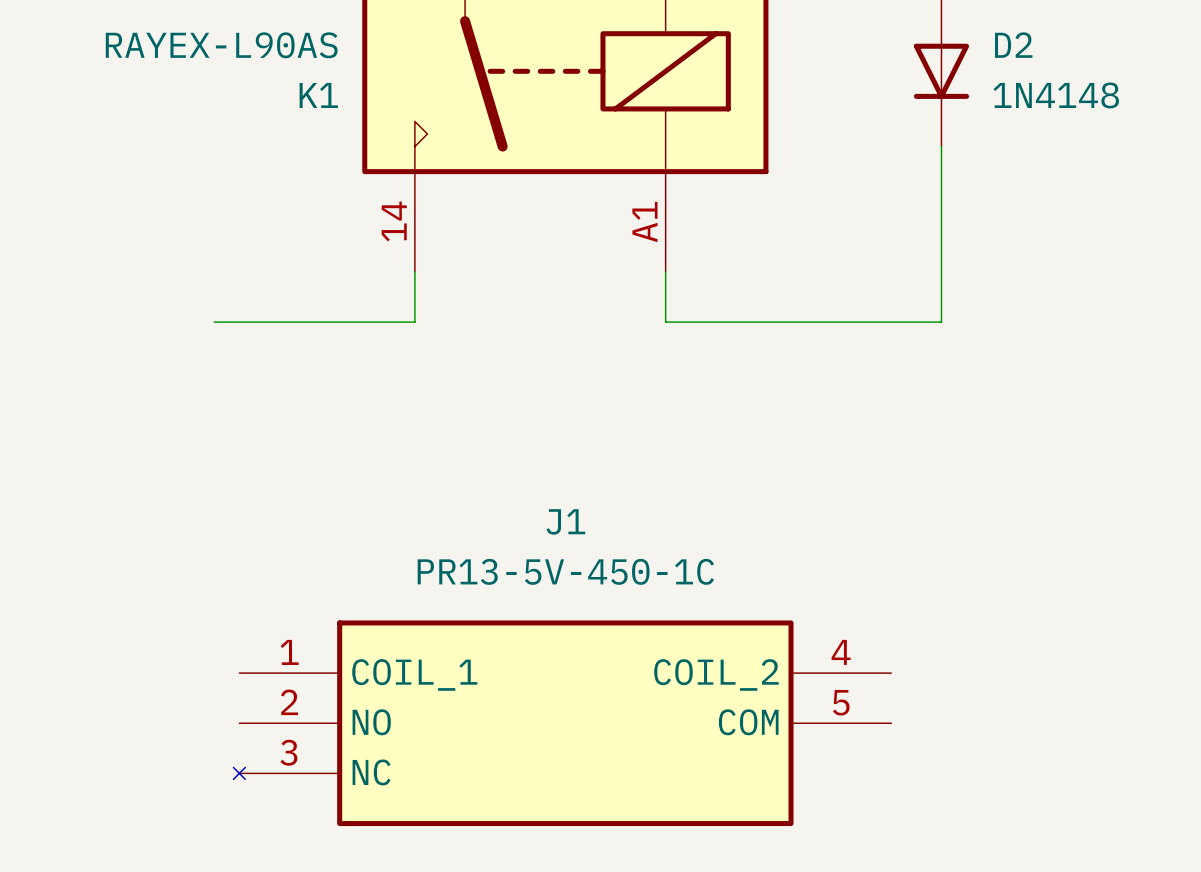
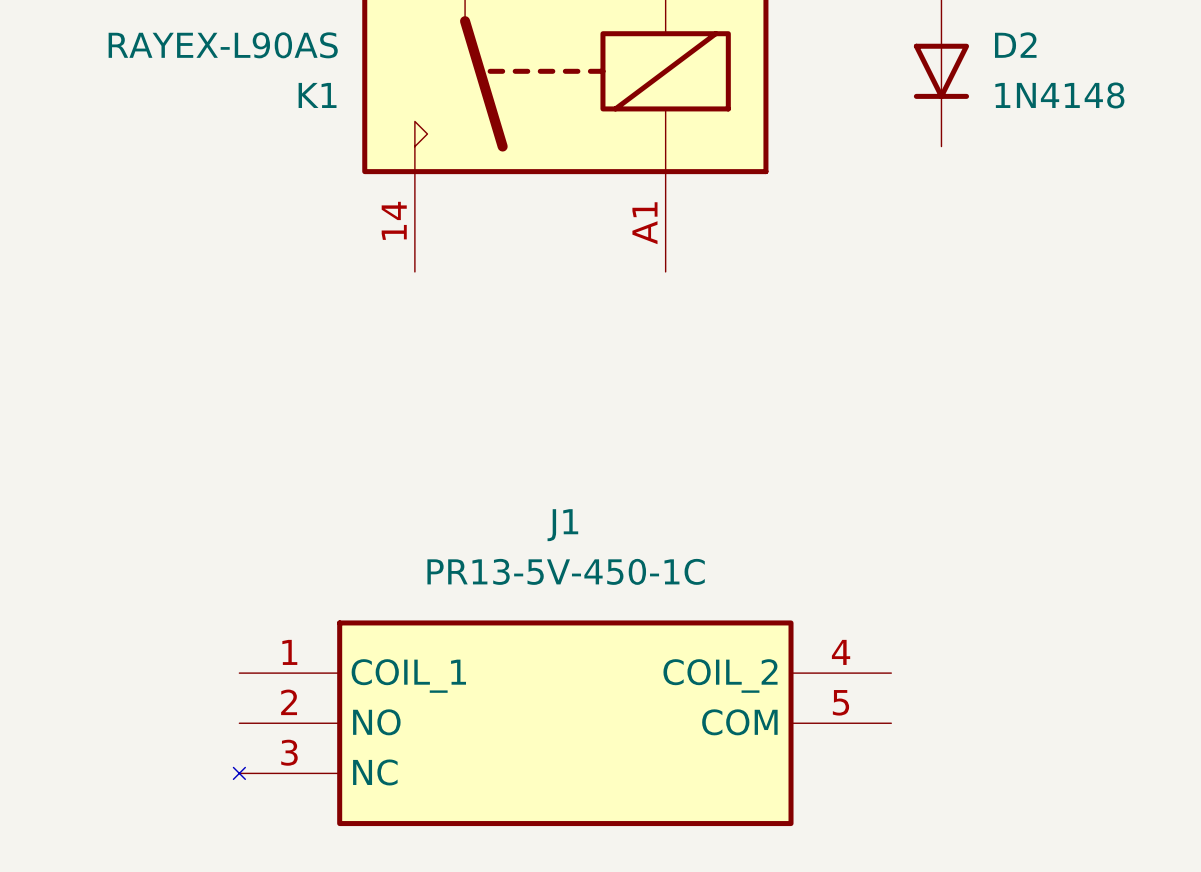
wire: (941, 146) (941, 322) (665, 322) (665, 271) -> none
wire: (414, 271) (414, 322) (214, 322) -> none

